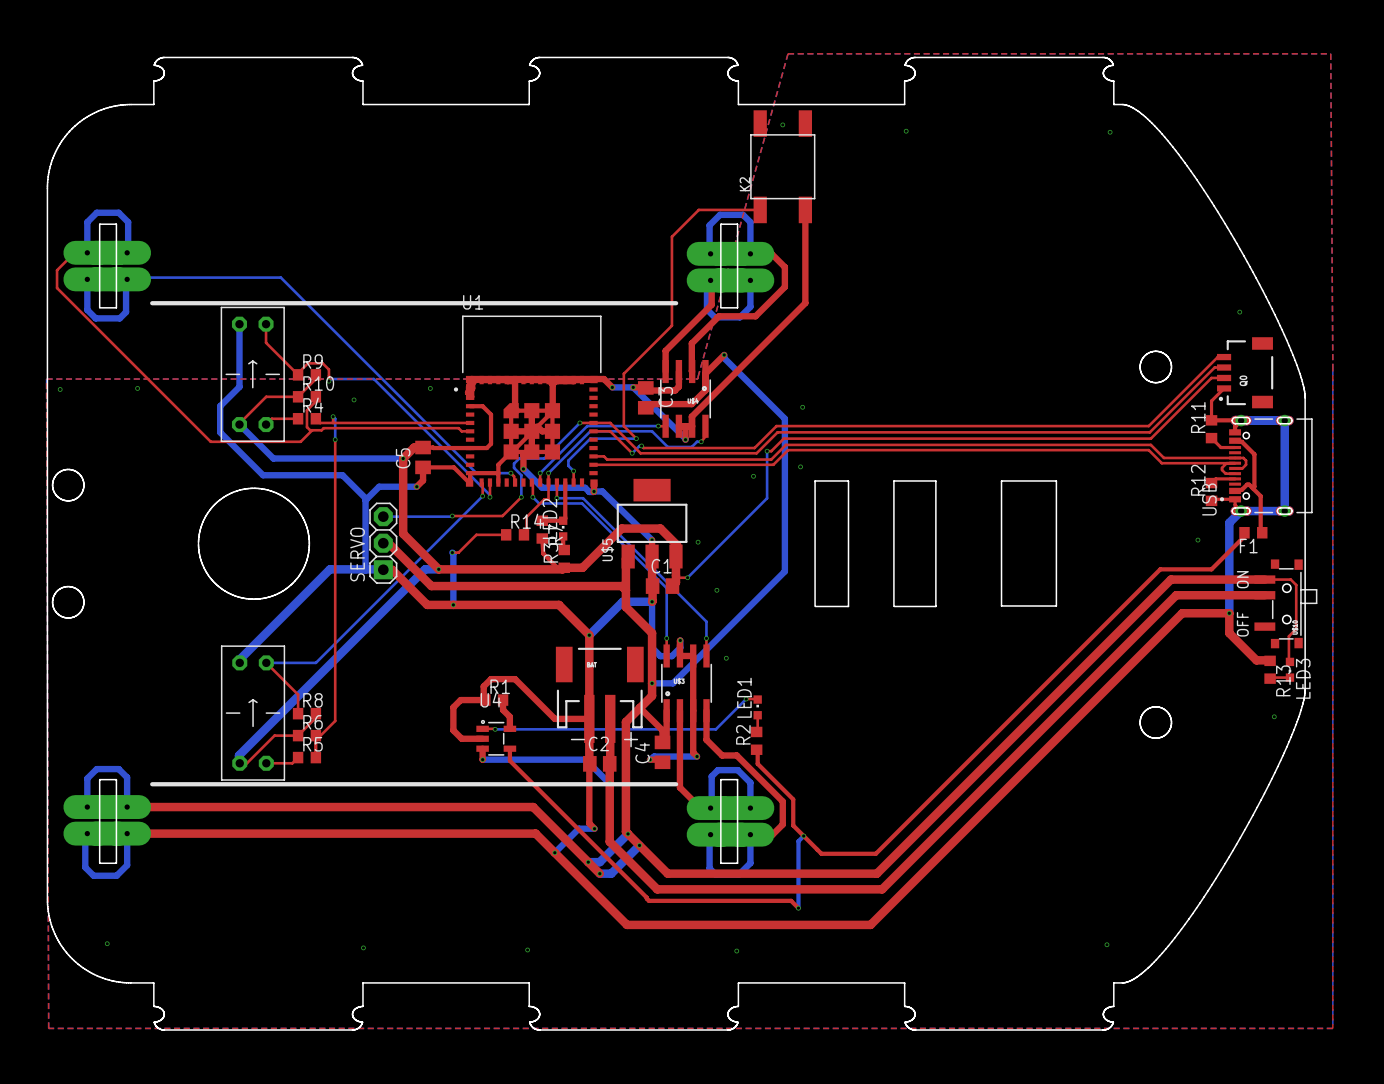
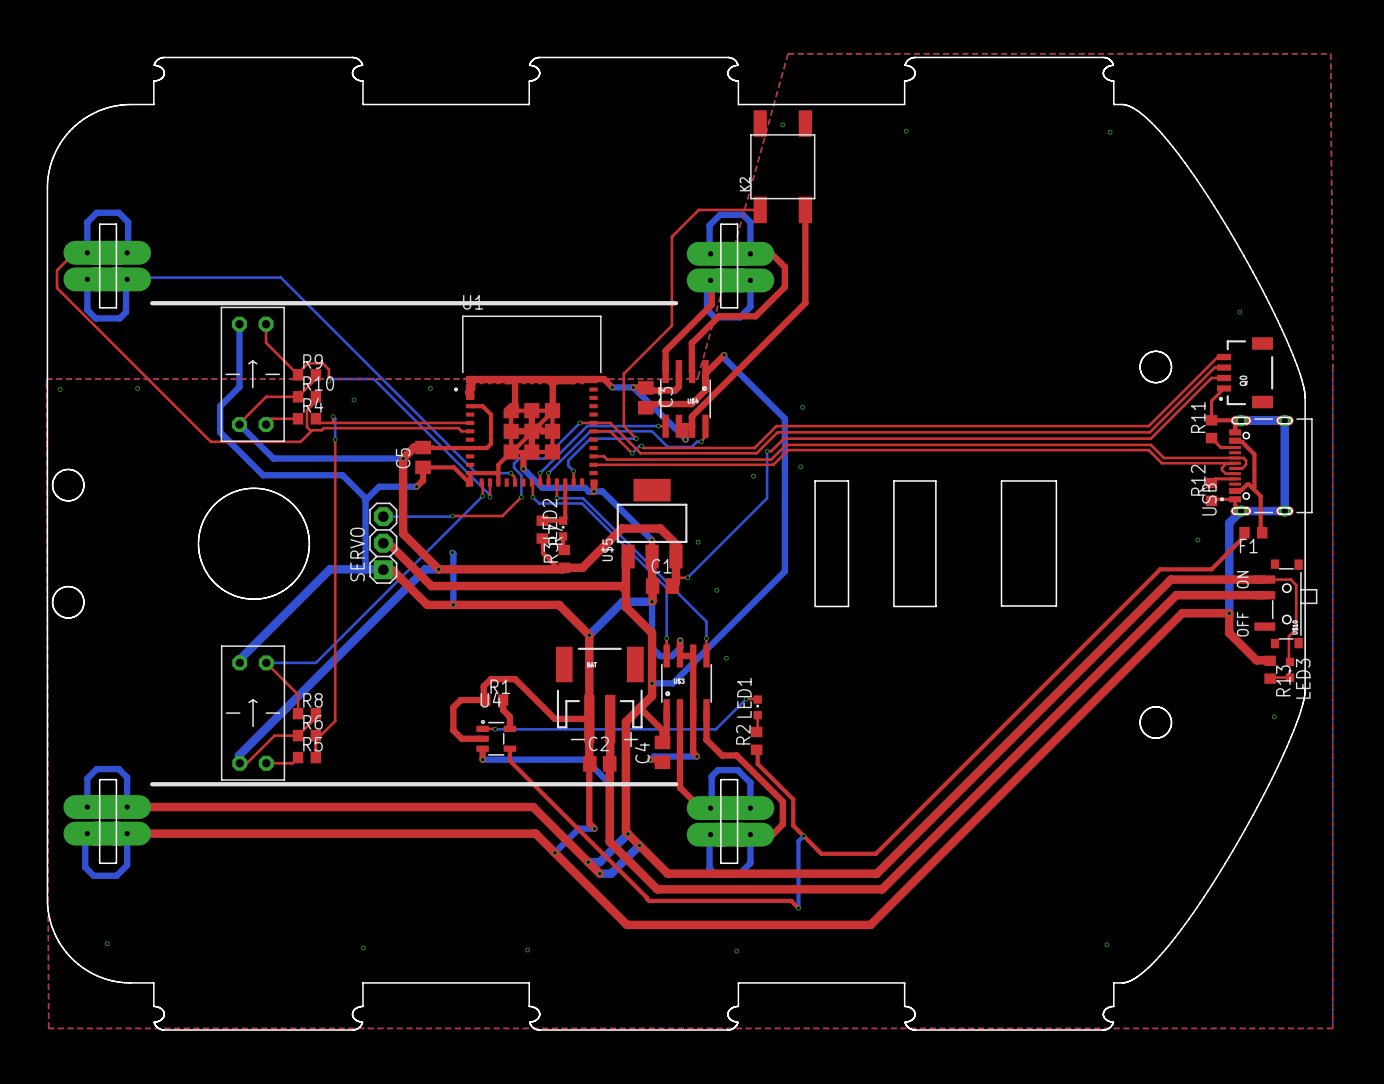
top track: (548, 482) (548, 499) (544, 499) (526, 517) (526, 532) (523, 534) -> none
top track: (506, 534) (476, 534) (458, 552) (452, 552) -> none
R14: (515, 534) -> none

